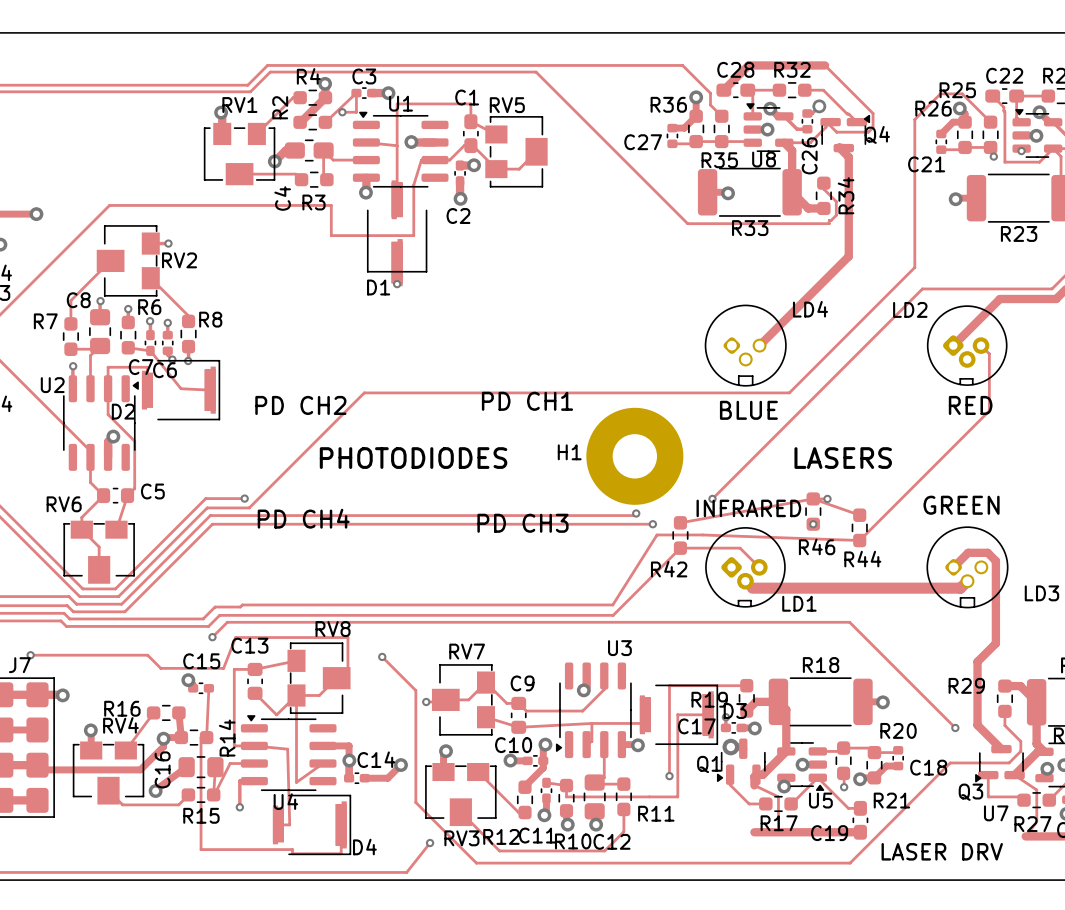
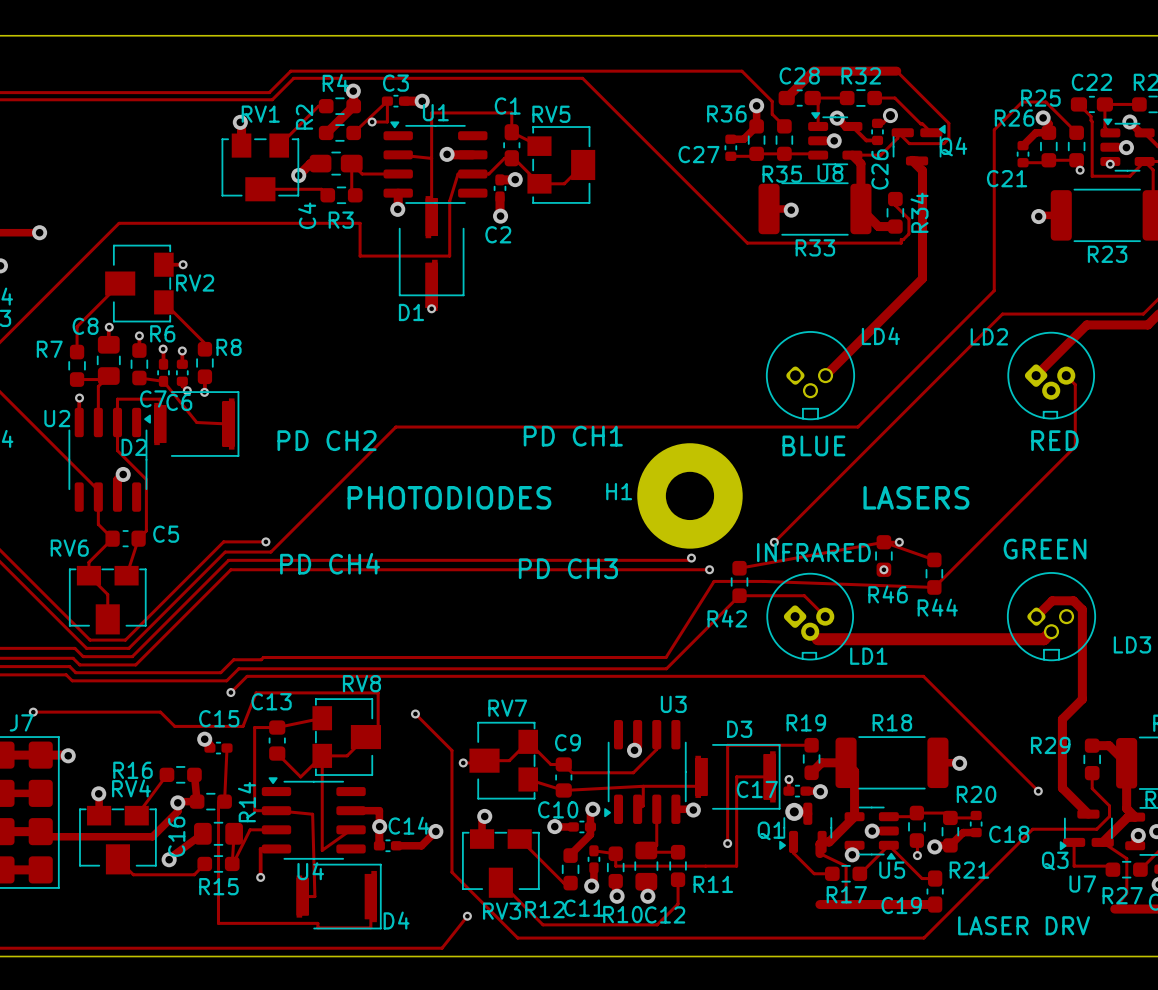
R19 name position: R19 (709, 699) -> R19 (806, 722)
D3 name position: D3 (735, 710) -> D3 (739, 729)

